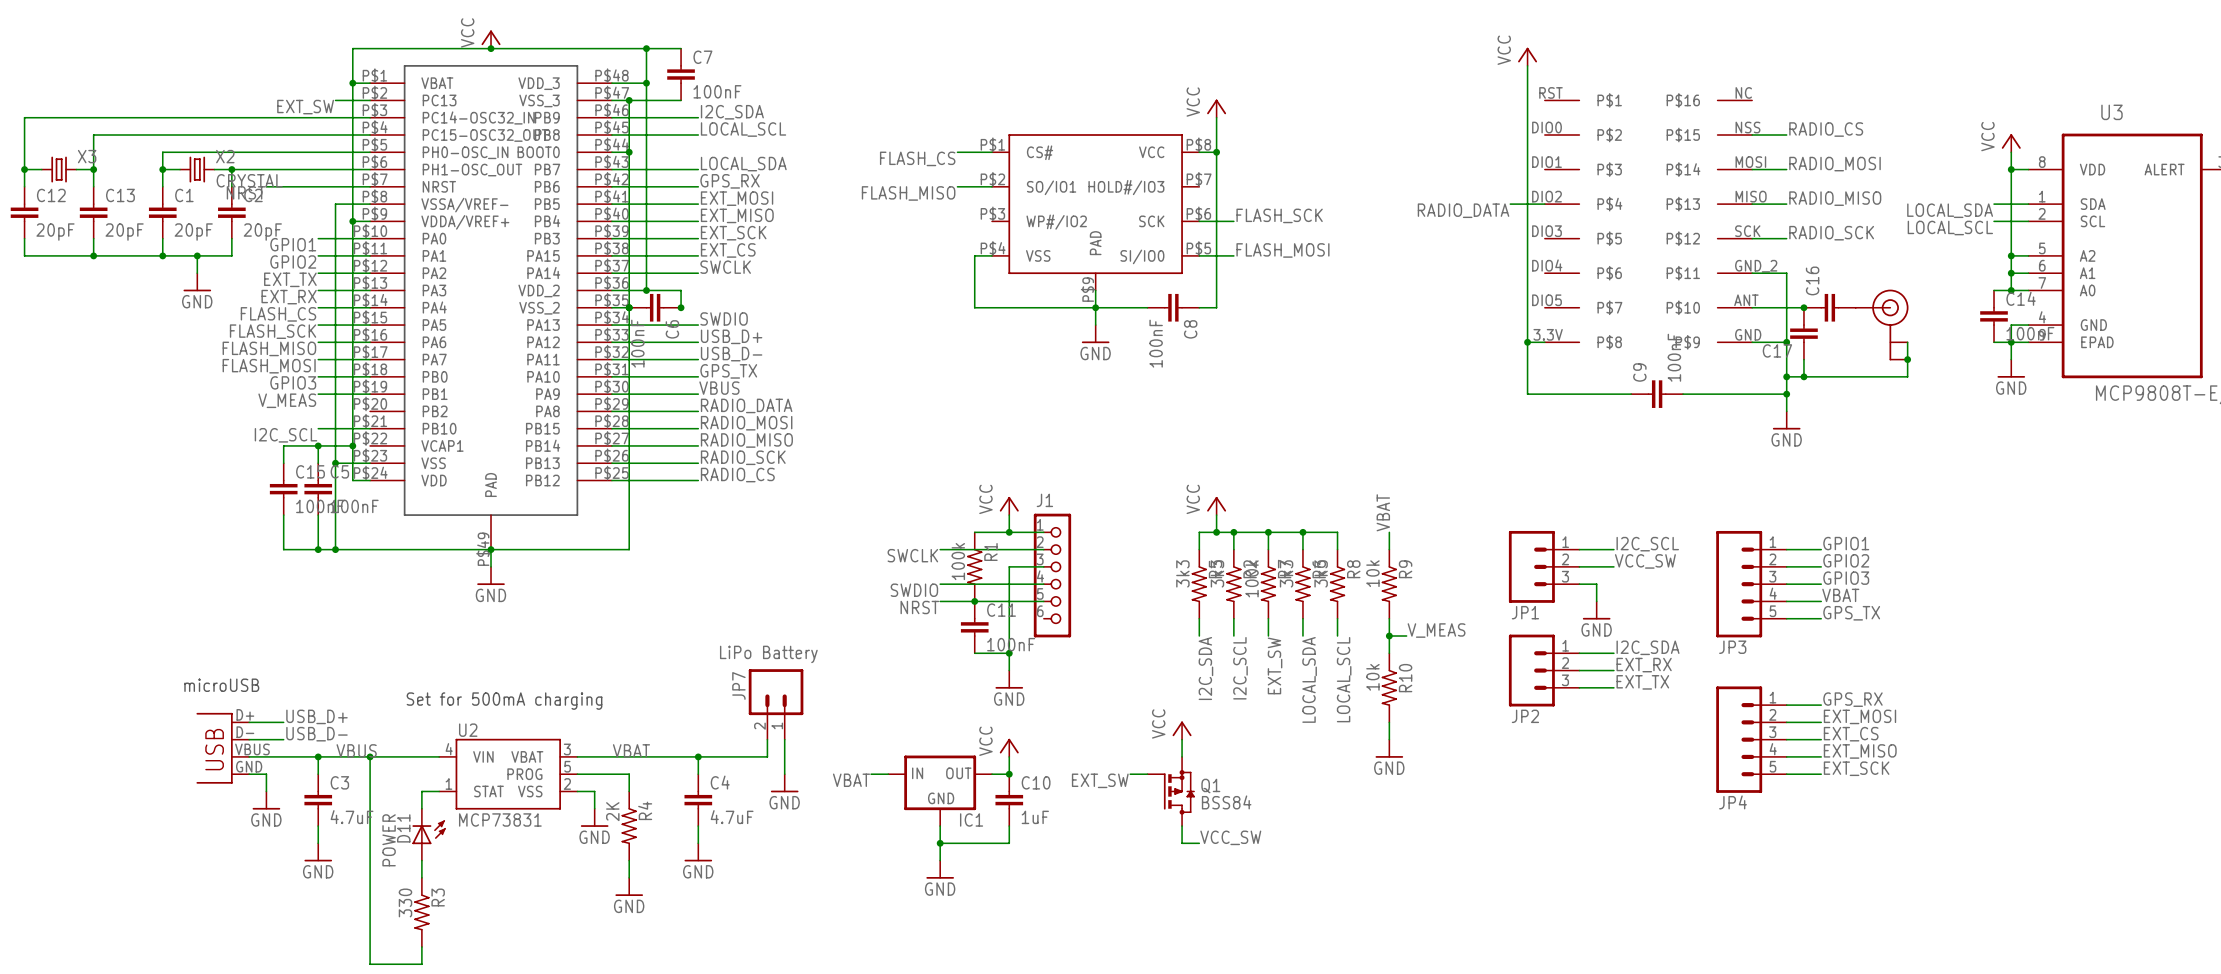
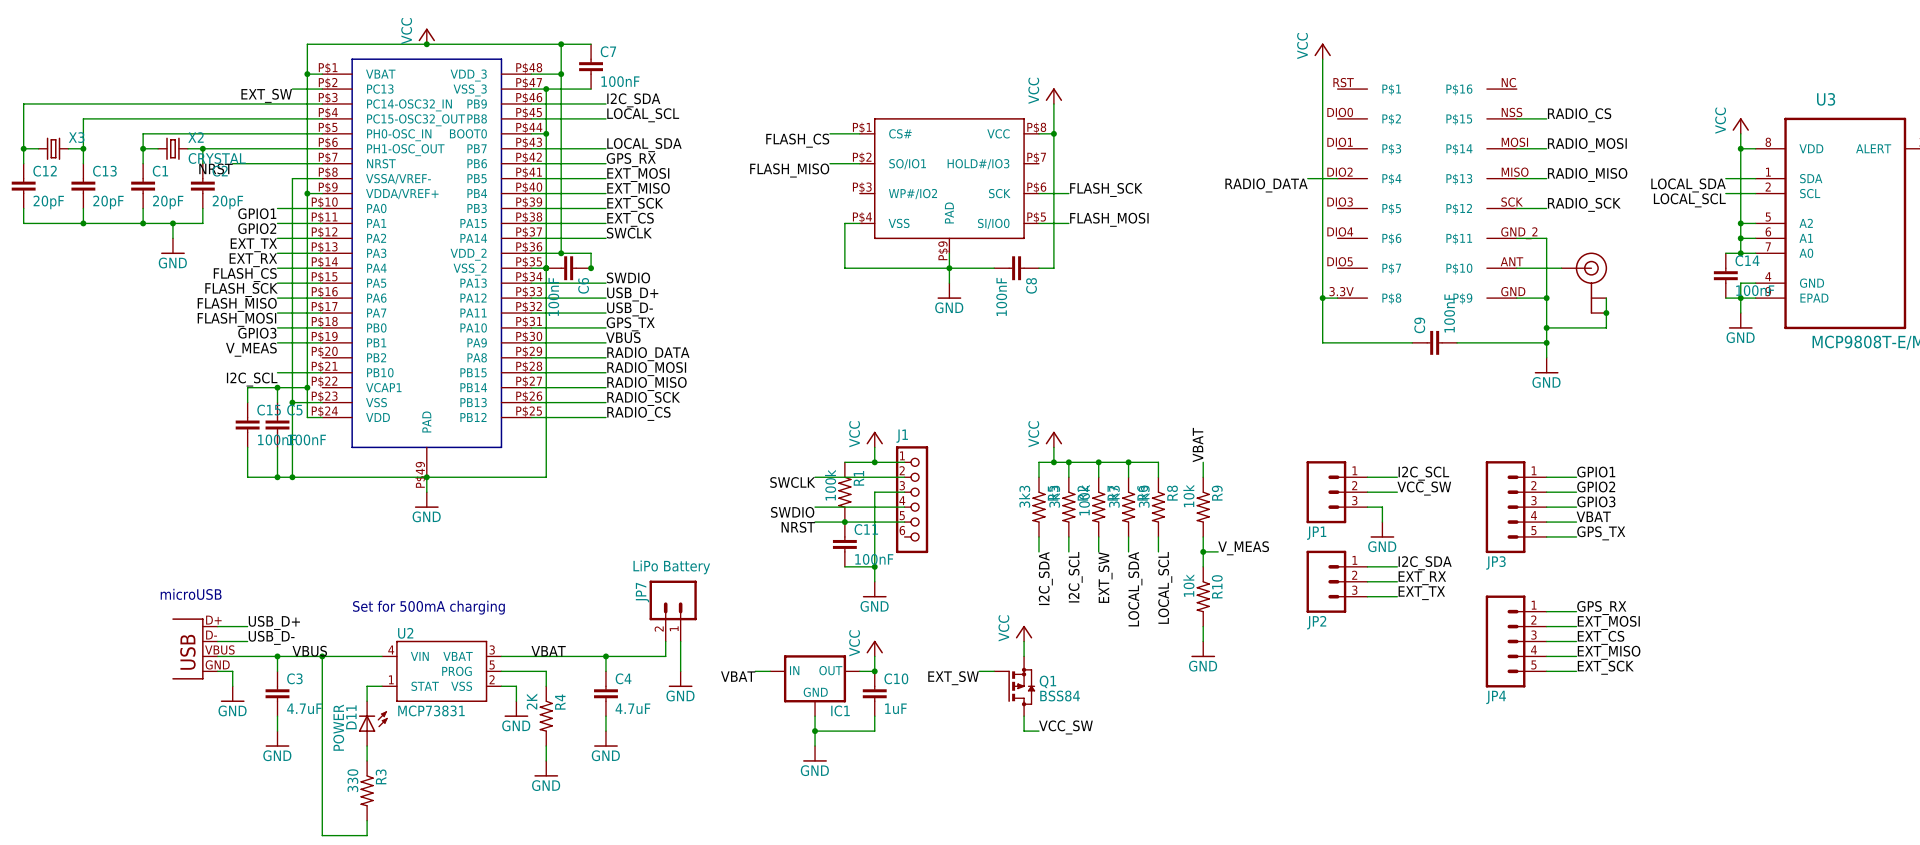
junction: (1803, 307) -> none
C16: (1829, 307) -> none
part position: (1882, 325) -> (1584, 283)
C17: (1803, 333) -> none
wire: (1907, 342) (1907, 376) (1855, 376) -> (1606, 298) (1606, 327)
wire: (1803, 359) (1803, 376) -> none
junction: none -> (1606, 313)
junction: (1907, 359) -> none
junction: (1803, 376) -> none

